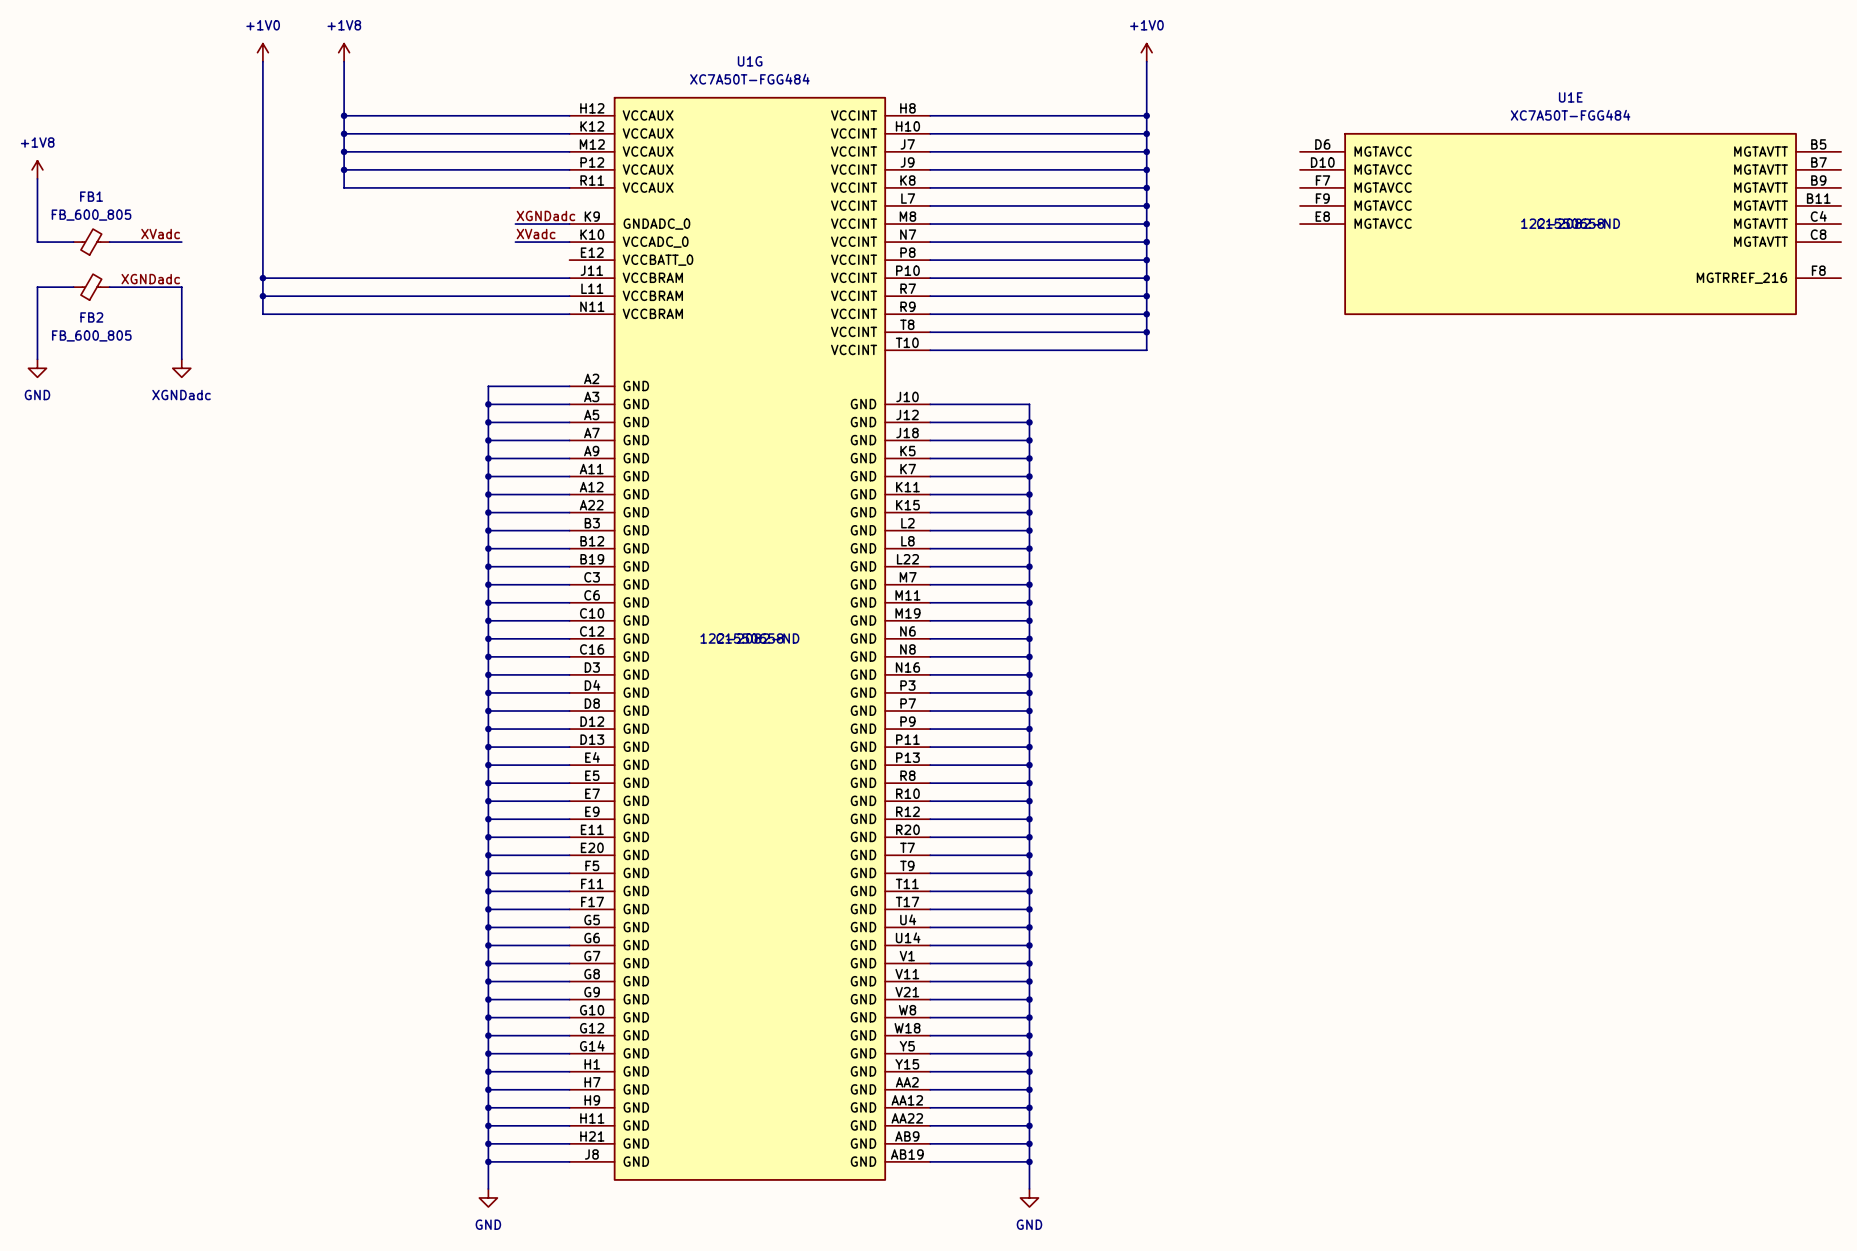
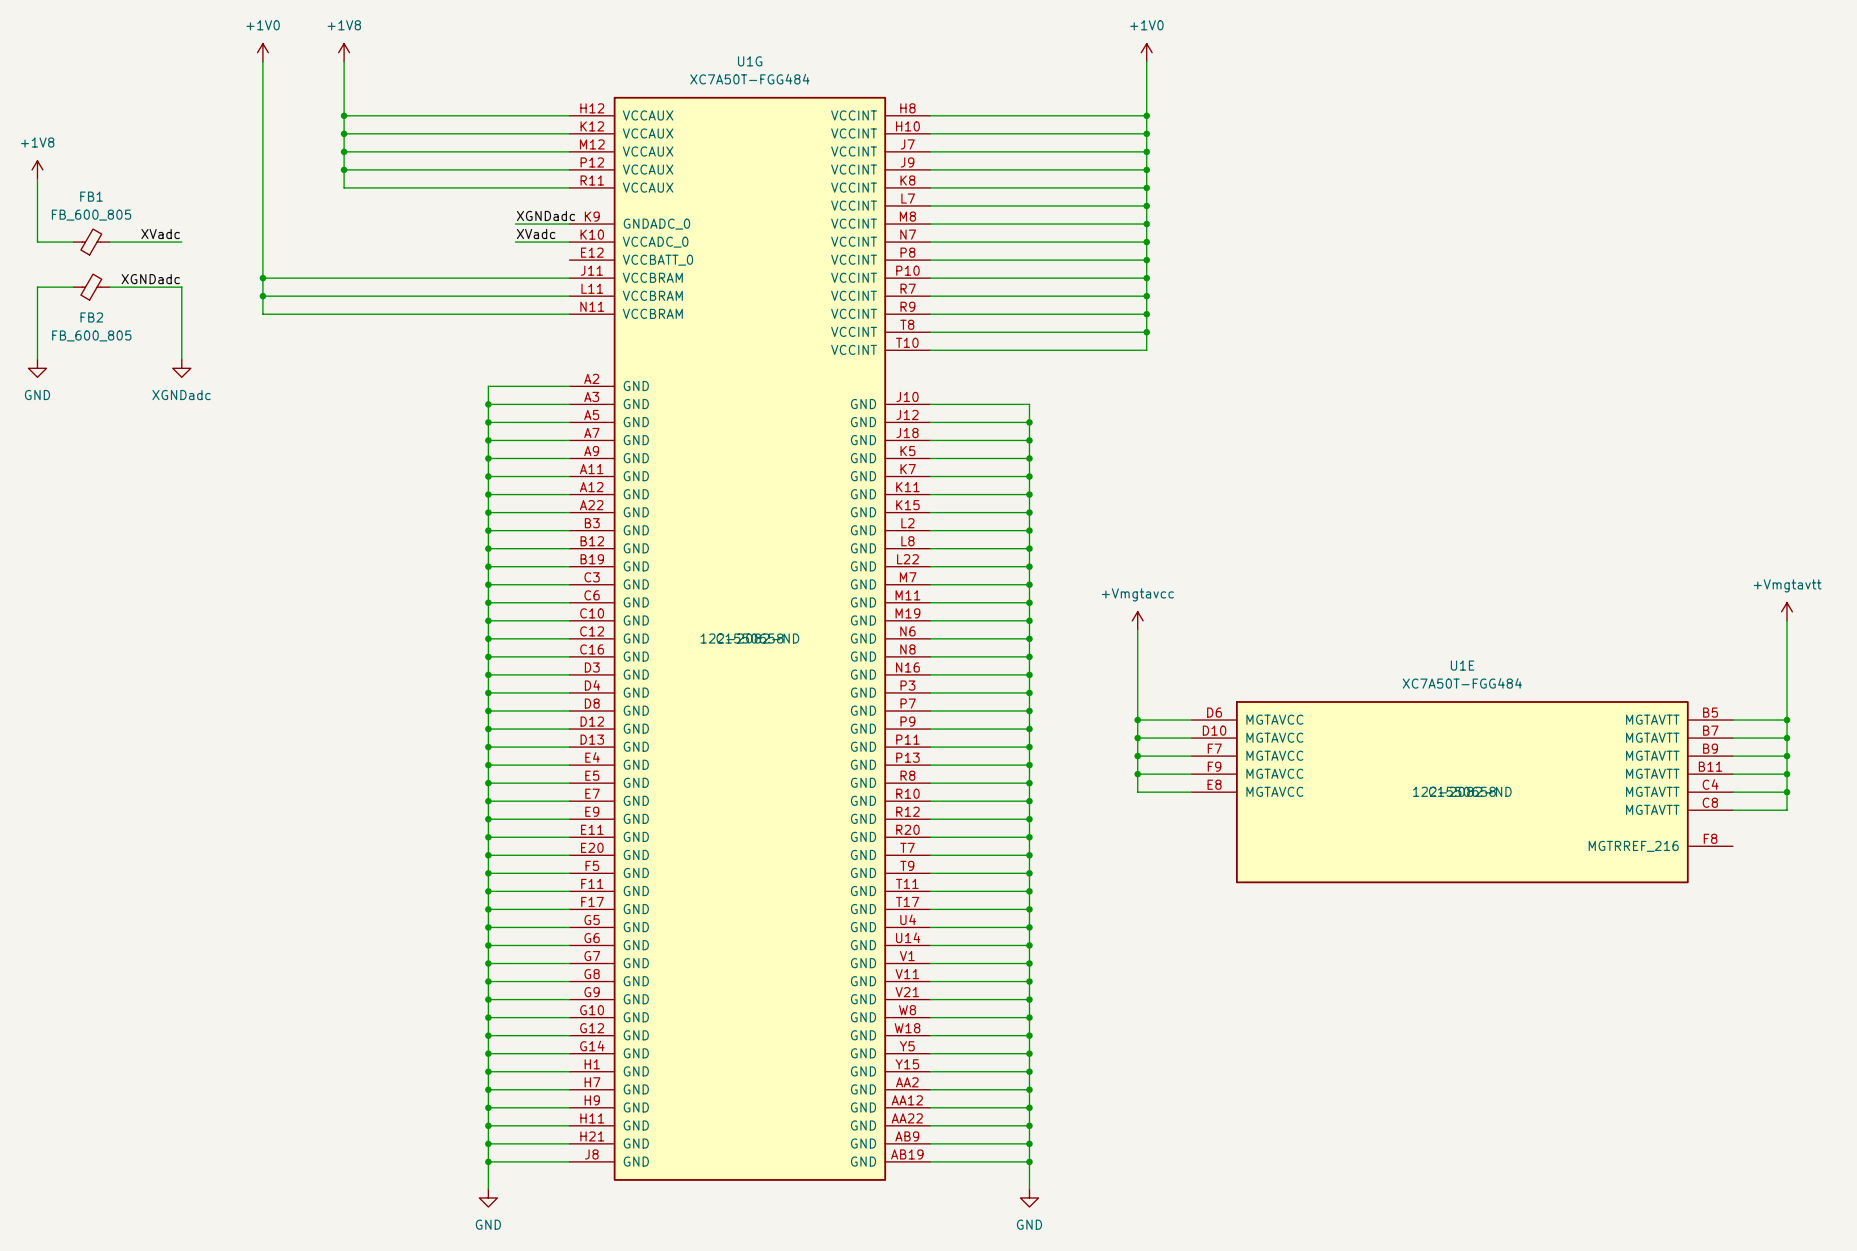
U1E position: (1570, 224) -> (1462, 792)
power symbol: none -> +Vmgtavtt (1787, 611)
power symbol: none -> +Vmgtavcc (1137, 620)
wire: none -> (1787, 620) (1787, 810) (1732, 810)
wire: none -> (1137, 629) (1137, 792) (1191, 792)
wire: none -> (1137, 720) (1191, 720)
junction: none -> (1137, 720)
wire: none -> (1732, 720) (1787, 720)
junction: none -> (1787, 720)
wire: none -> (1137, 738) (1191, 738)
junction: none -> (1137, 738)
wire: none -> (1732, 738) (1787, 738)
junction: none -> (1787, 738)
wire: none -> (1137, 756) (1191, 756)
junction: none -> (1137, 756)
wire: none -> (1732, 756) (1787, 756)
junction: none -> (1787, 756)
wire: none -> (1137, 774) (1191, 774)
junction: none -> (1137, 774)
wire: none -> (1732, 774) (1787, 774)
junction: none -> (1787, 774)
wire: none -> (1732, 792) (1787, 792)
junction: none -> (1787, 792)

